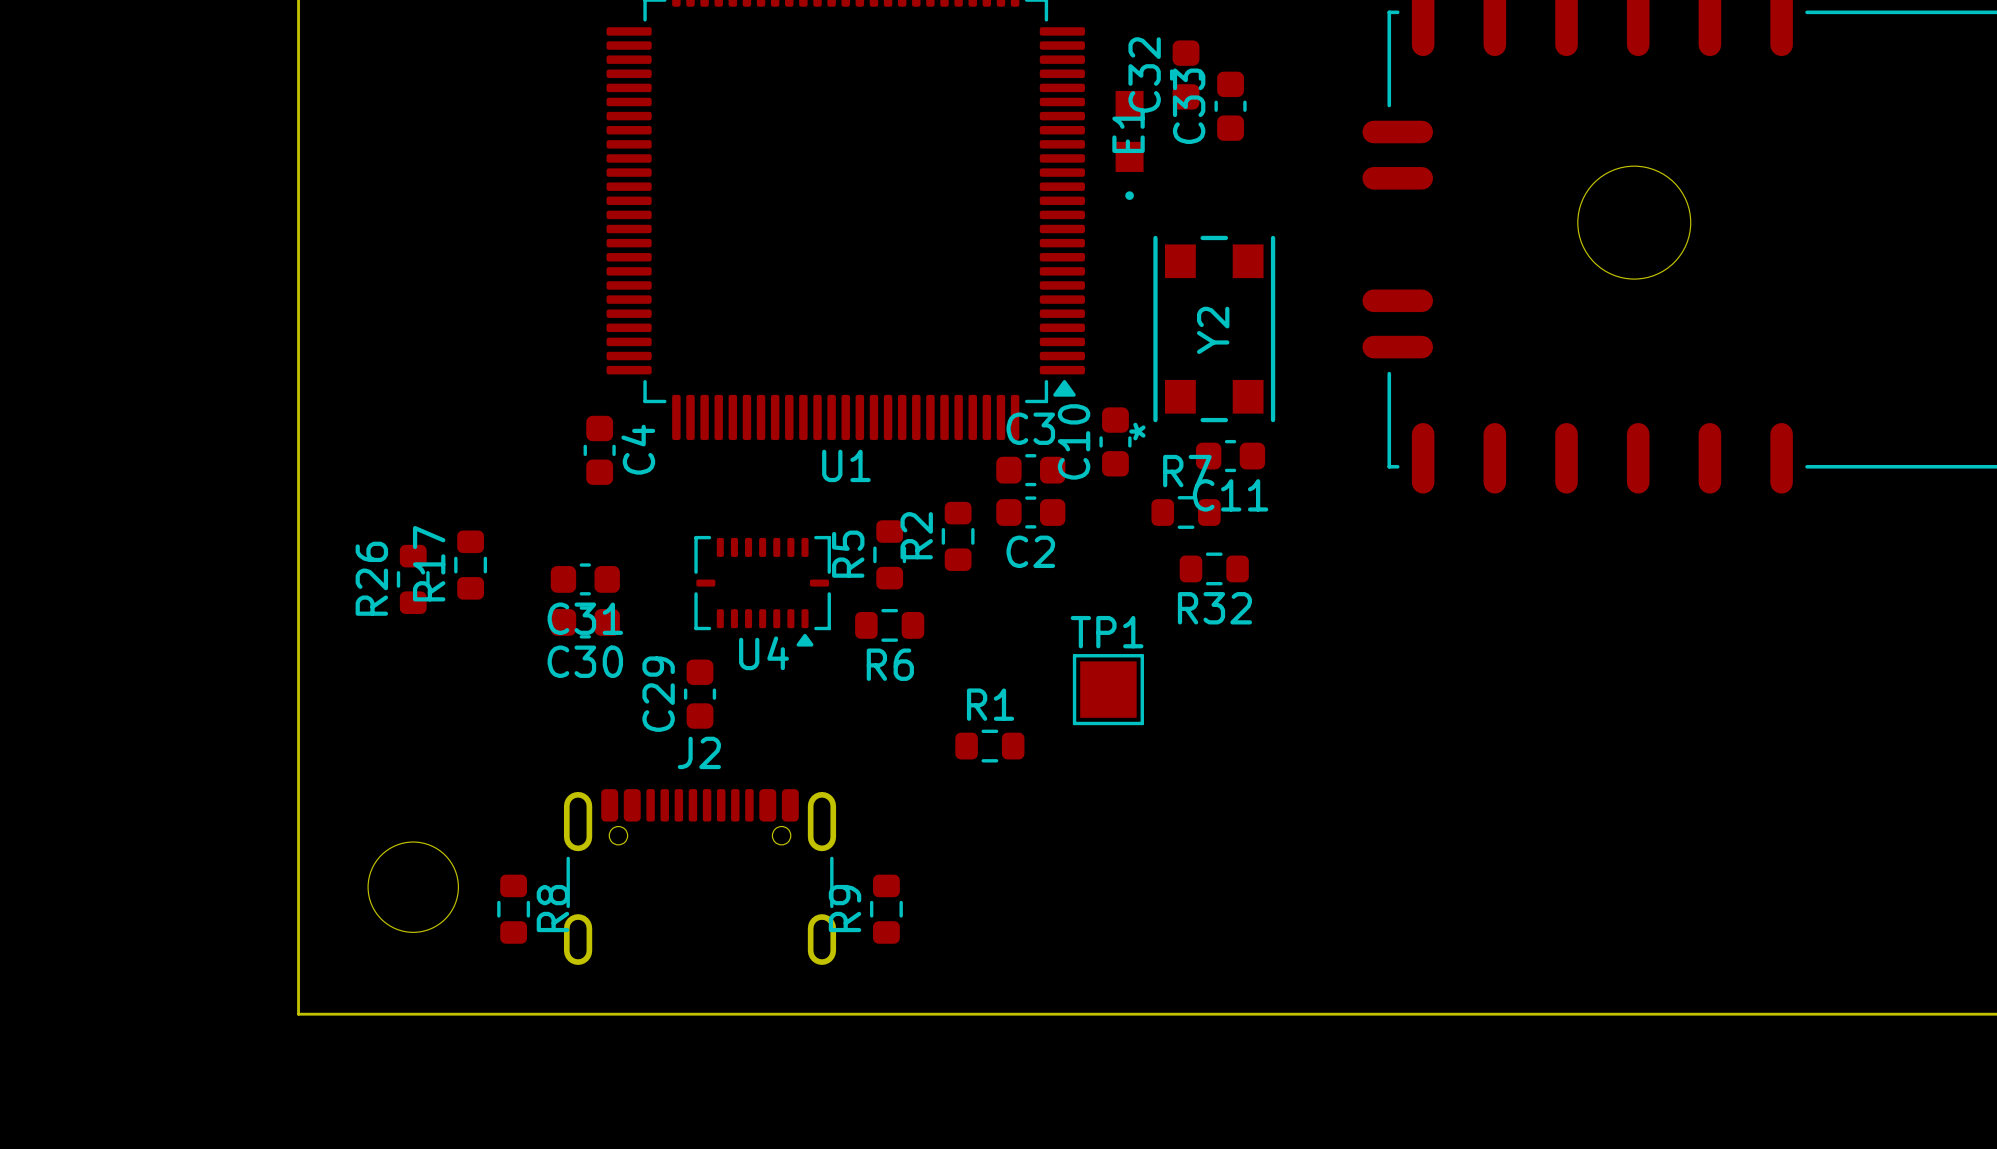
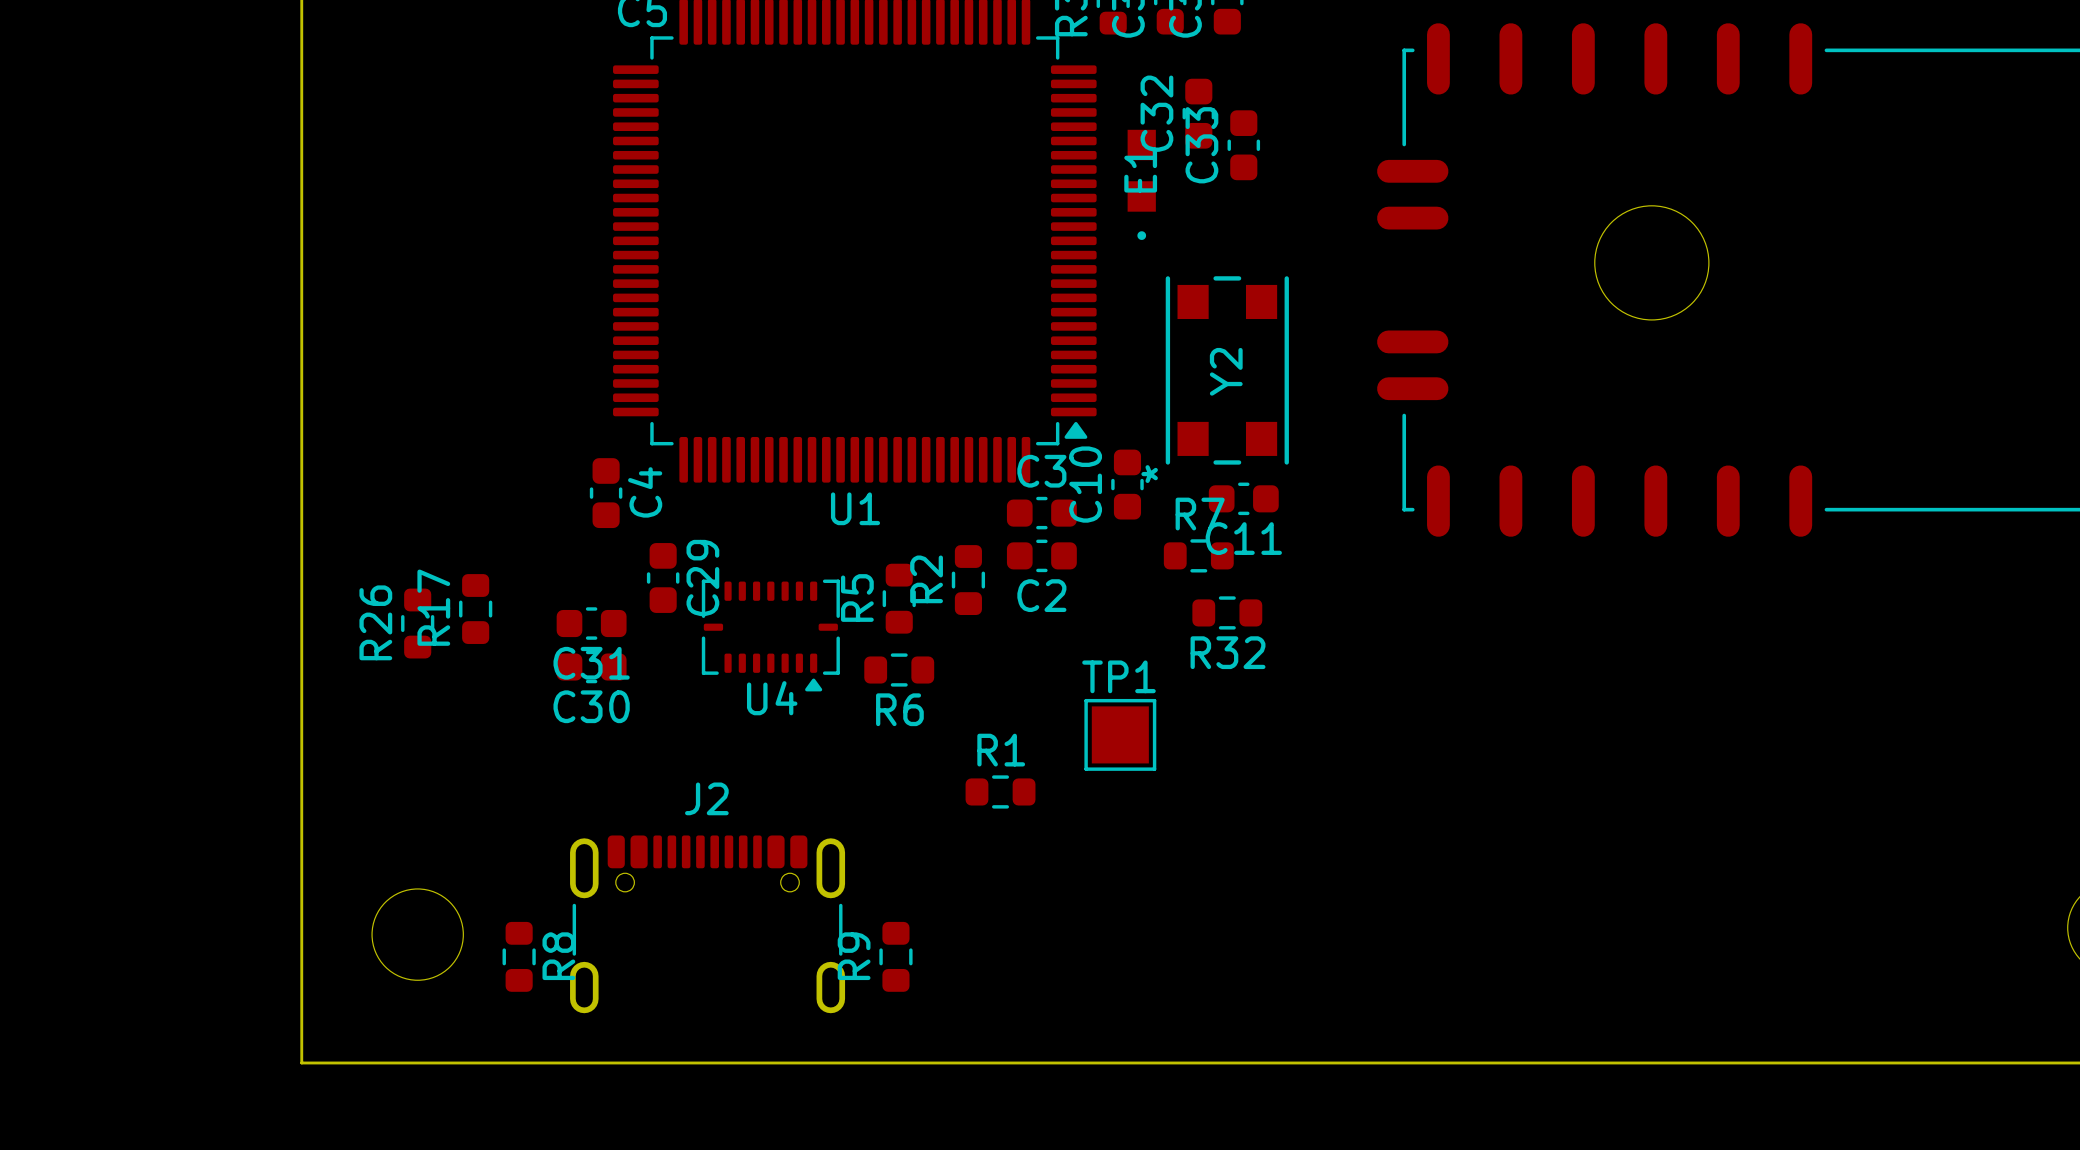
C29 name position: C29 (658, 694) -> C29 (702, 577)
C29 position: (700, 694) -> (663, 577)

